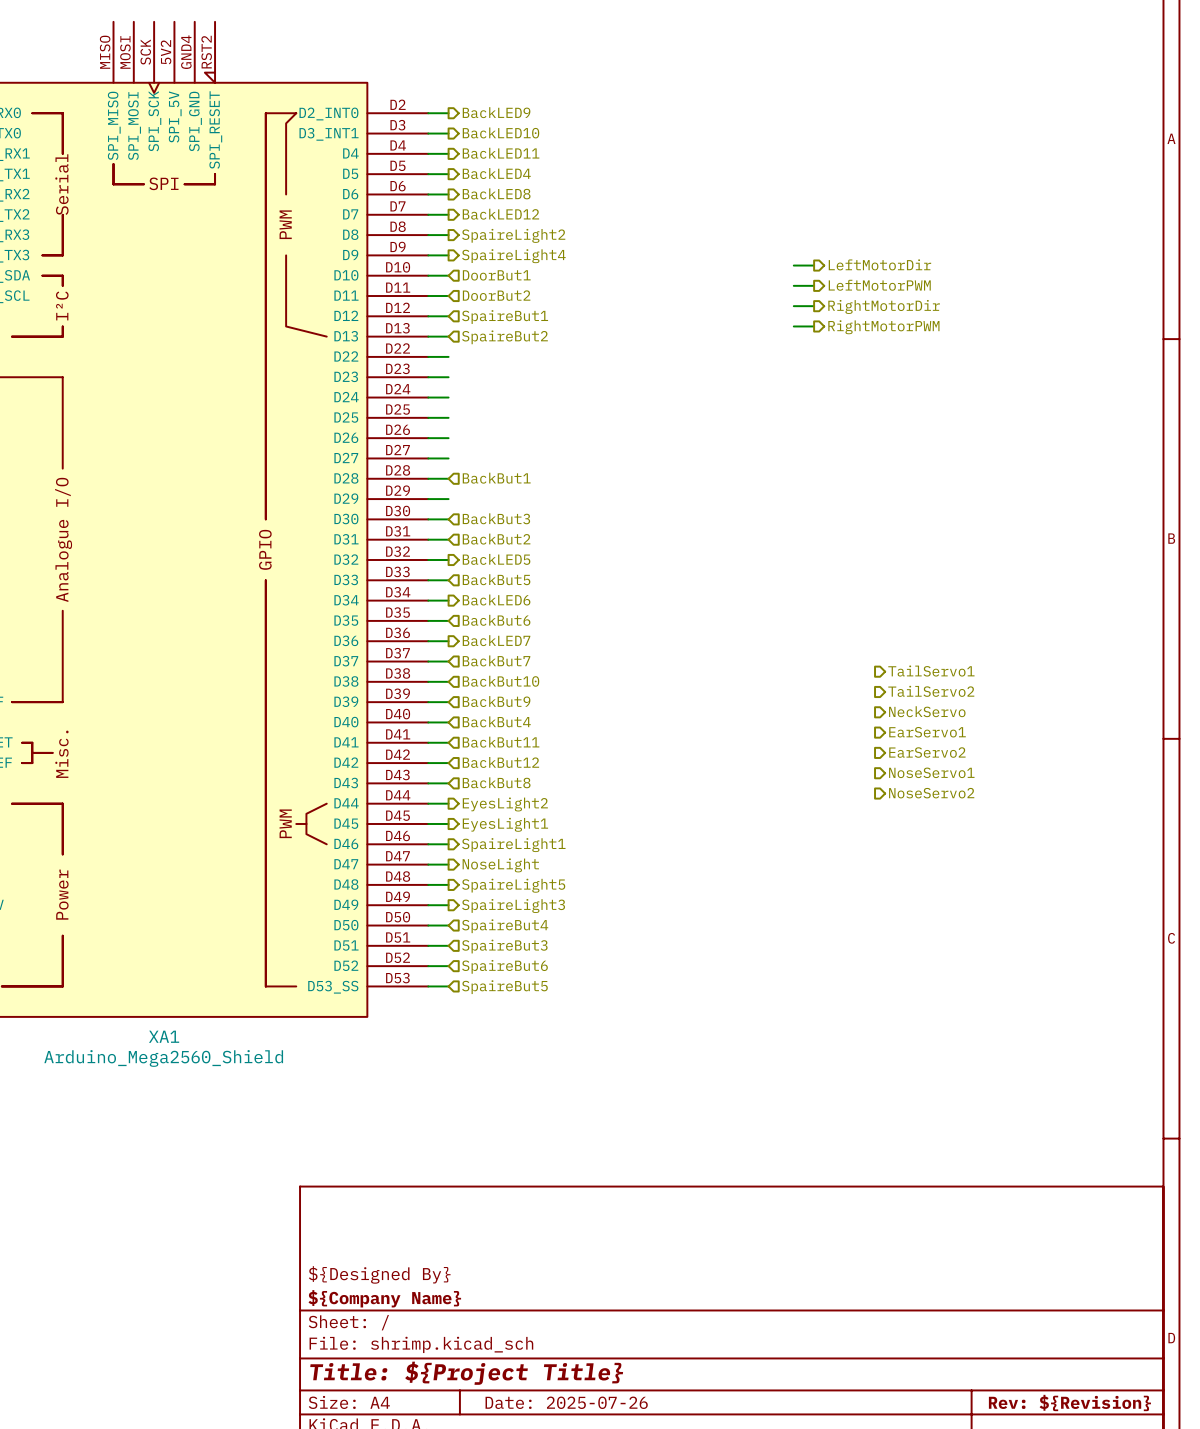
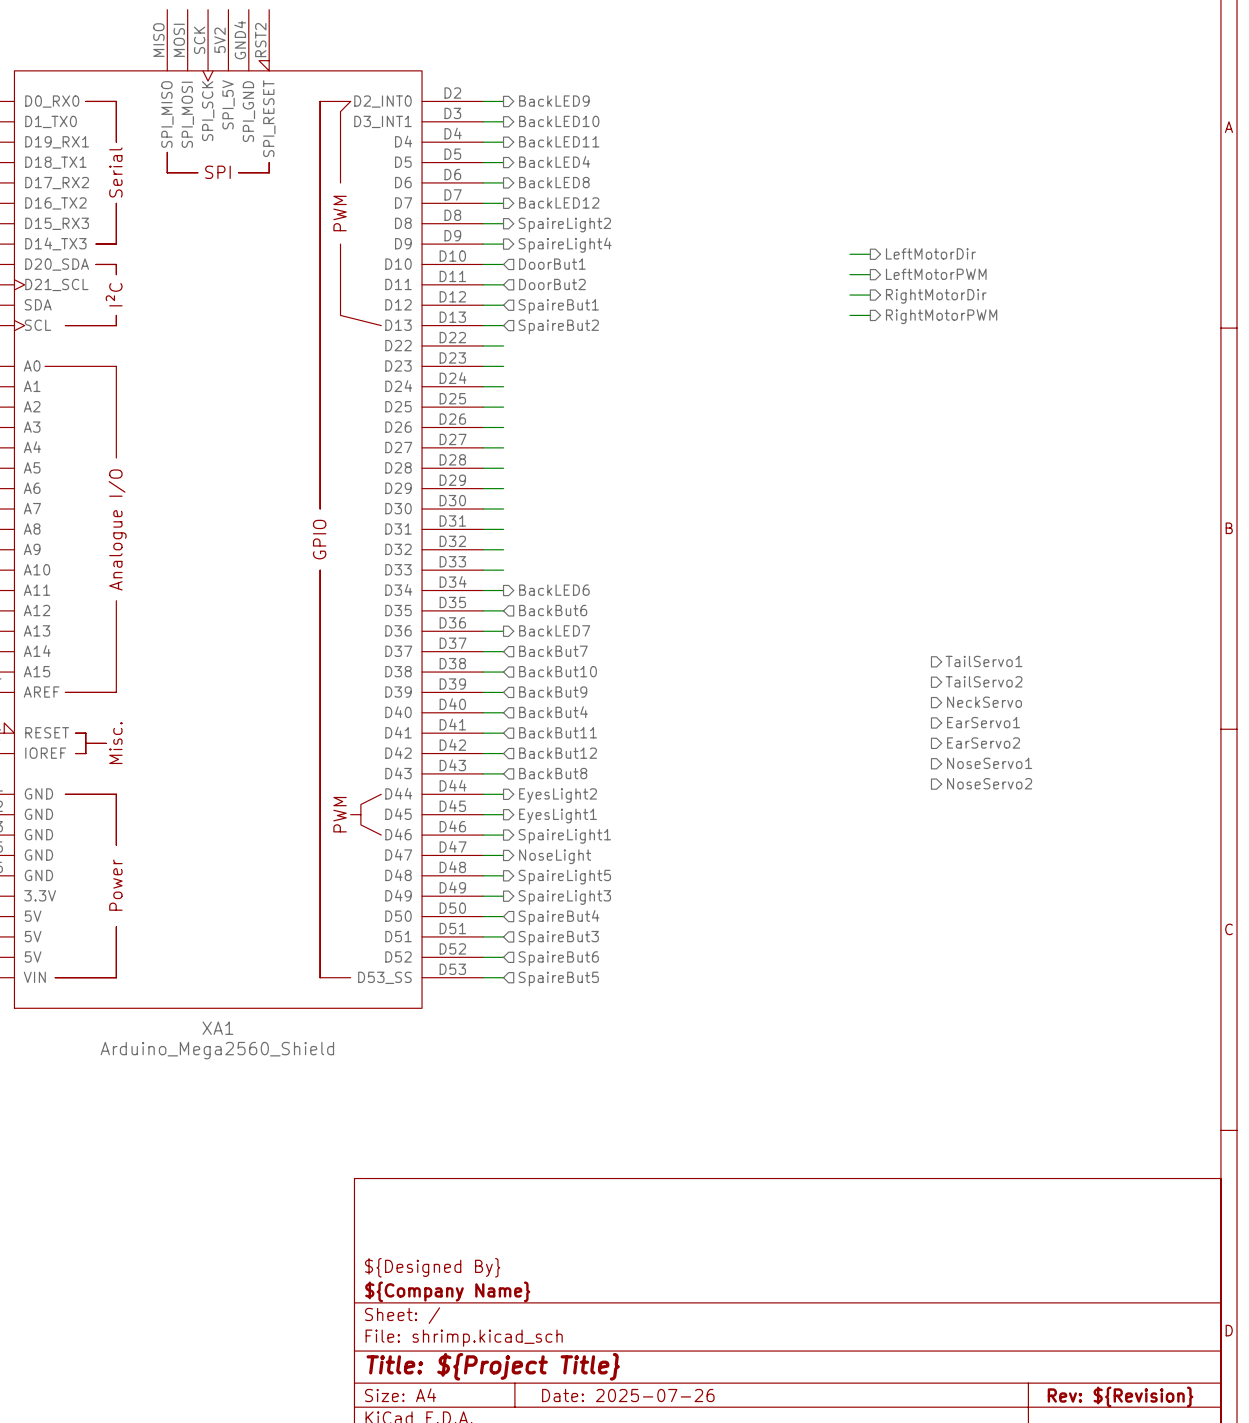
hierarchical label: BackBut1 (496, 478) -> none
hierarchical label: BackBut3 (496, 518) -> none
hierarchical label: BackBut2 (496, 539) -> none
hierarchical label: BackLED5 (496, 559) -> none
hierarchical label: BackBut5 (496, 579) -> none

